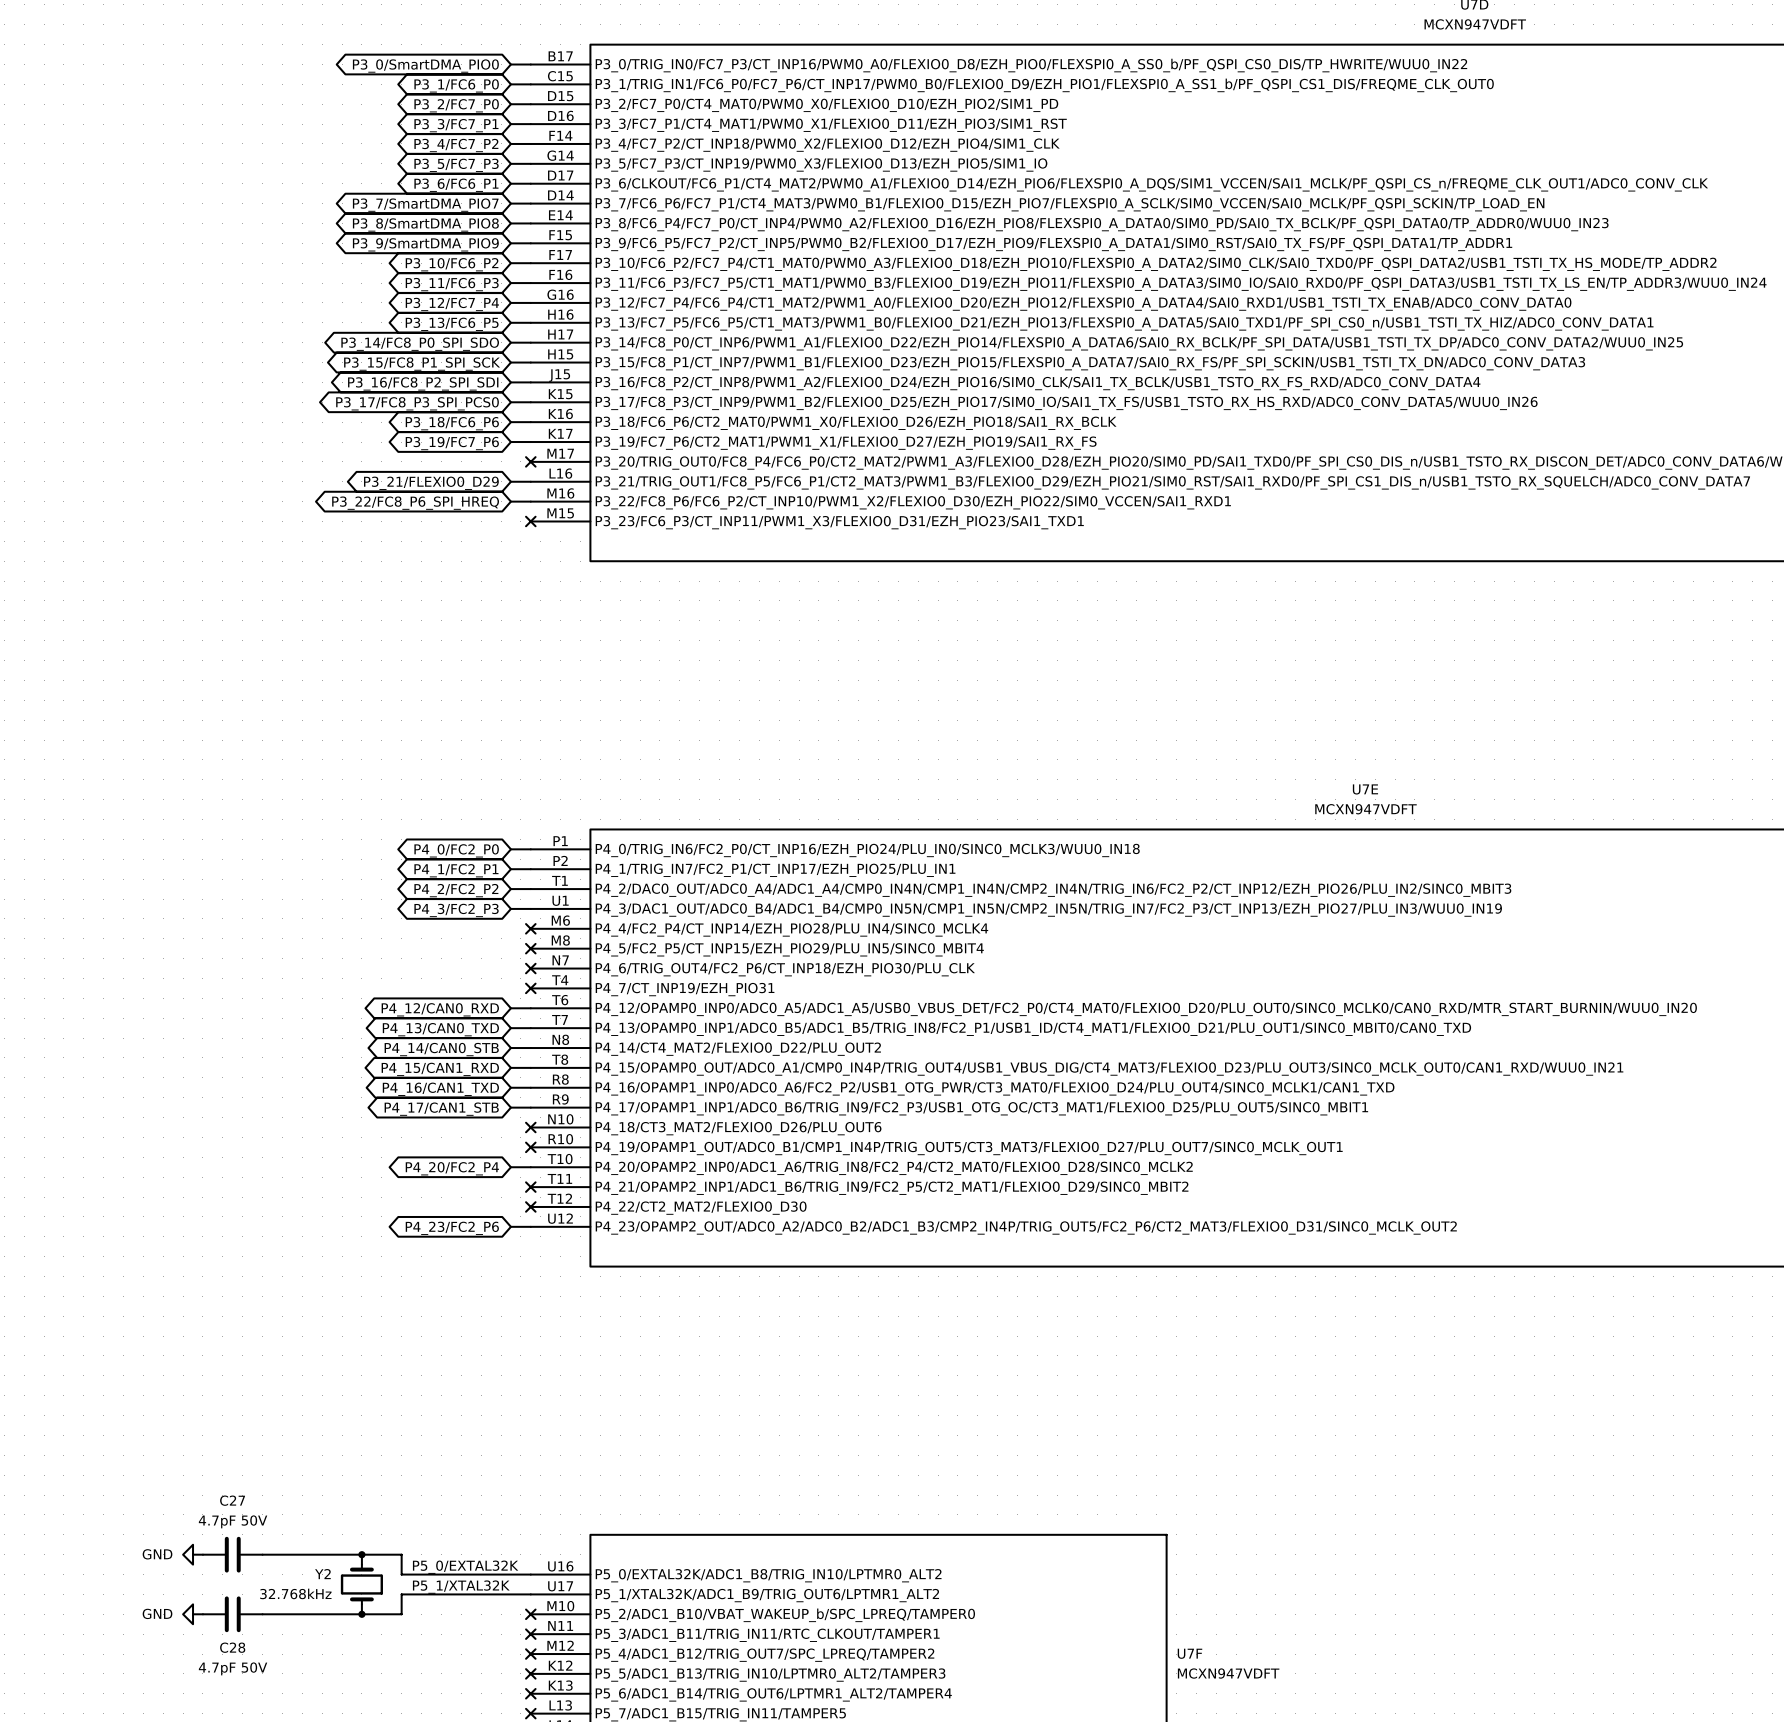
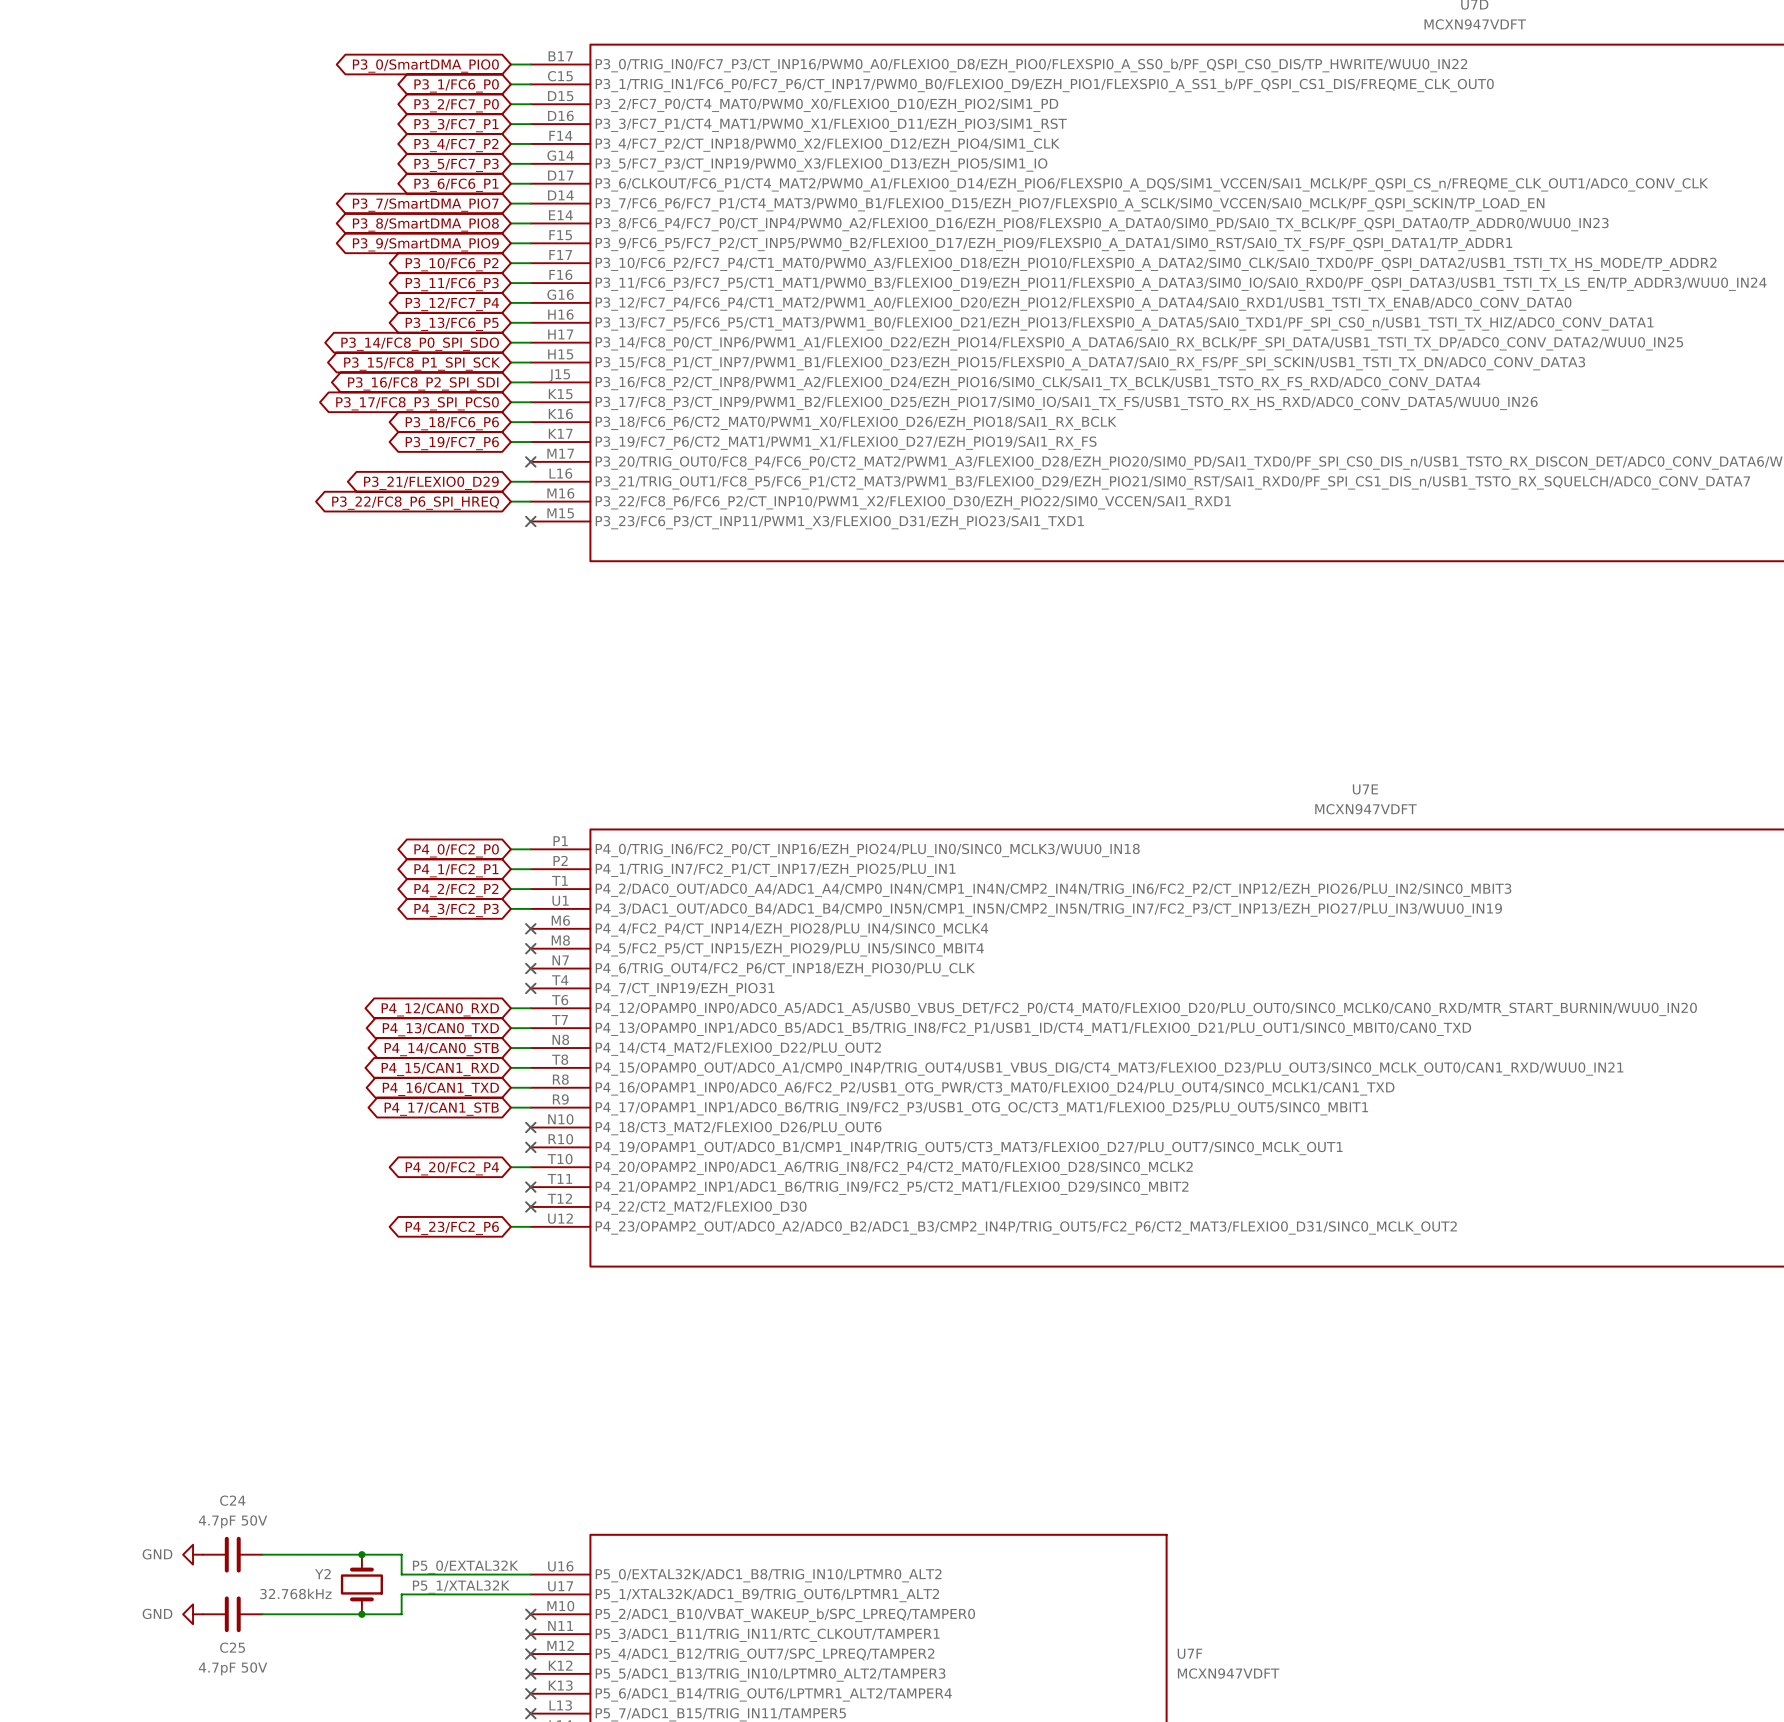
C27 name: C27 (232, 1500) -> C24 (232, 1500)
C28 name: C28 (232, 1647) -> C25 (232, 1647)

